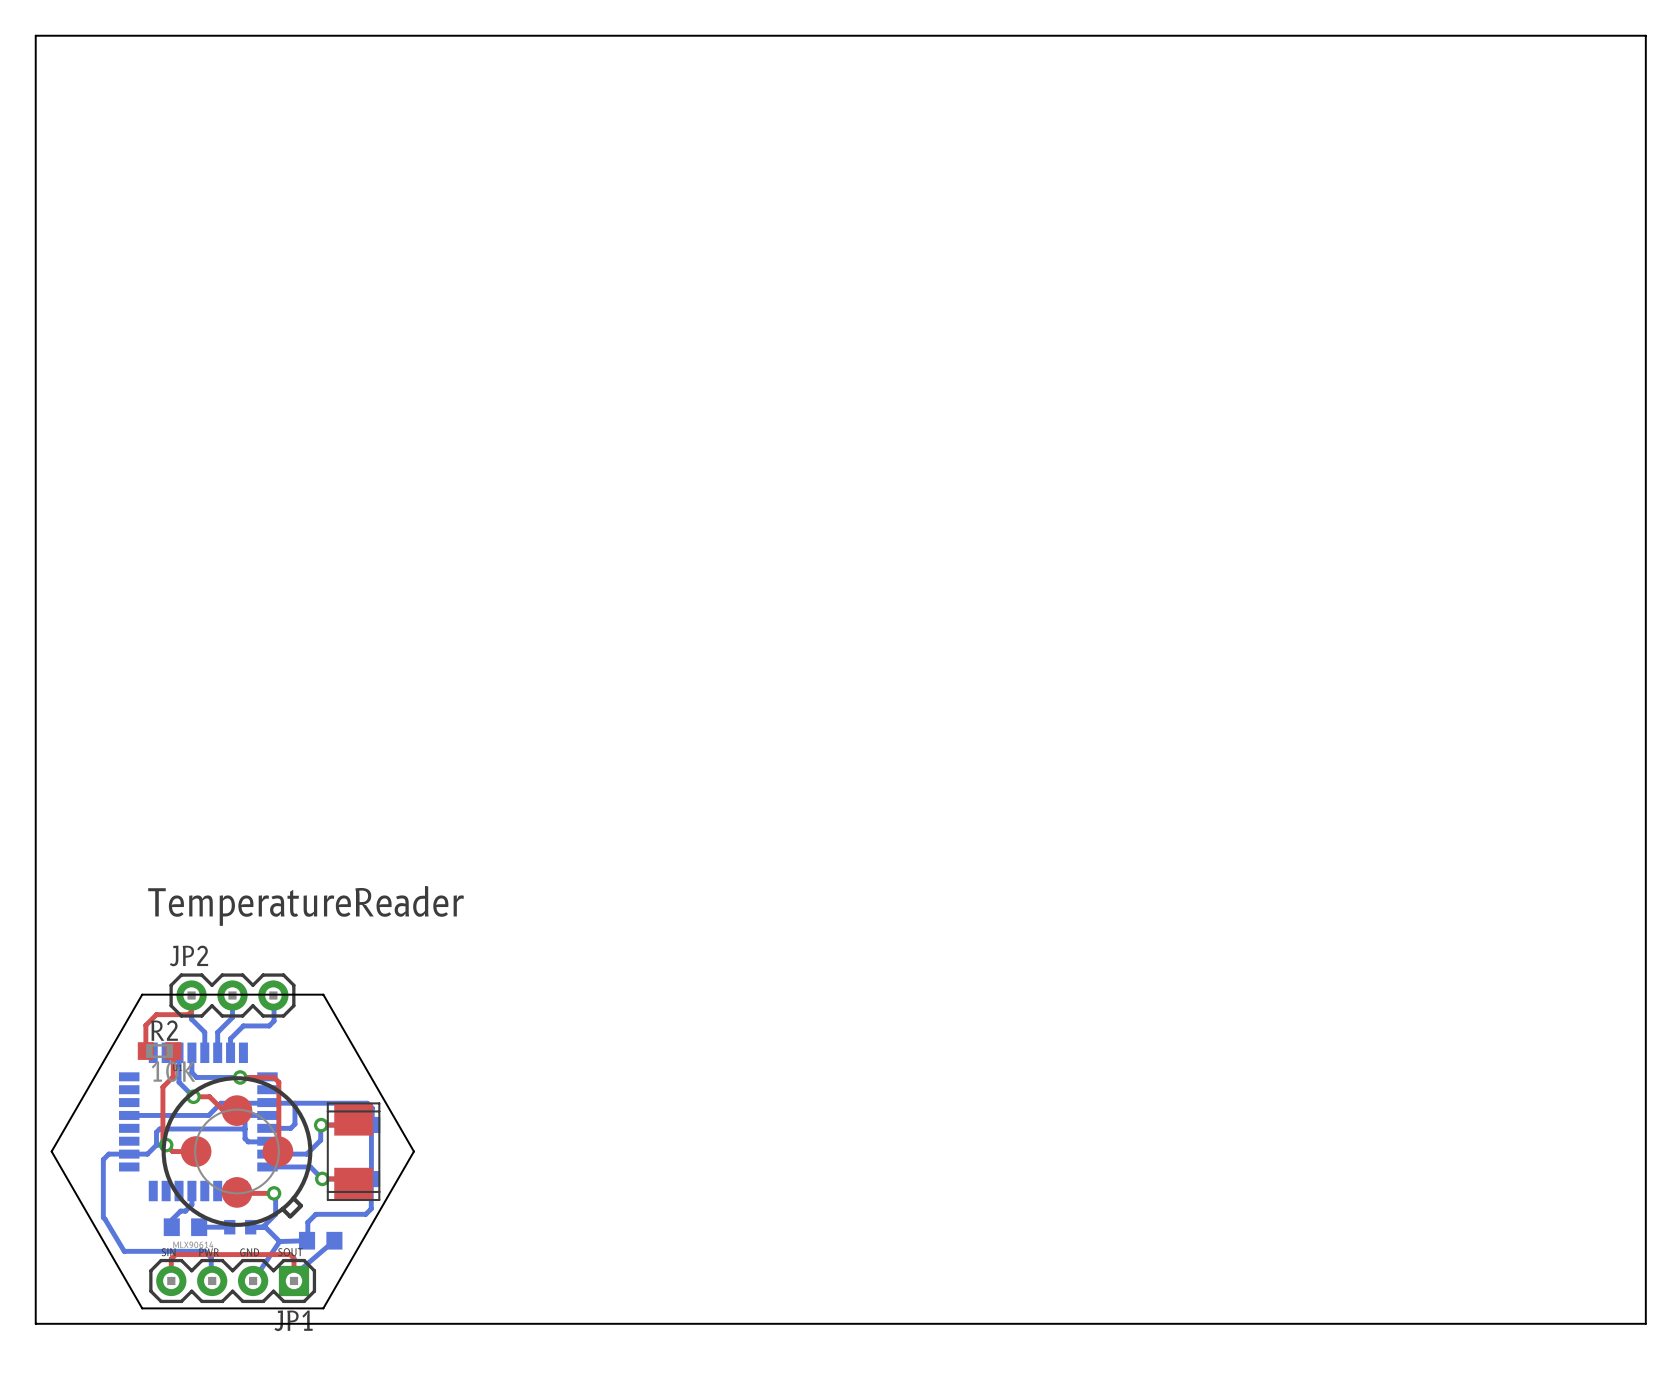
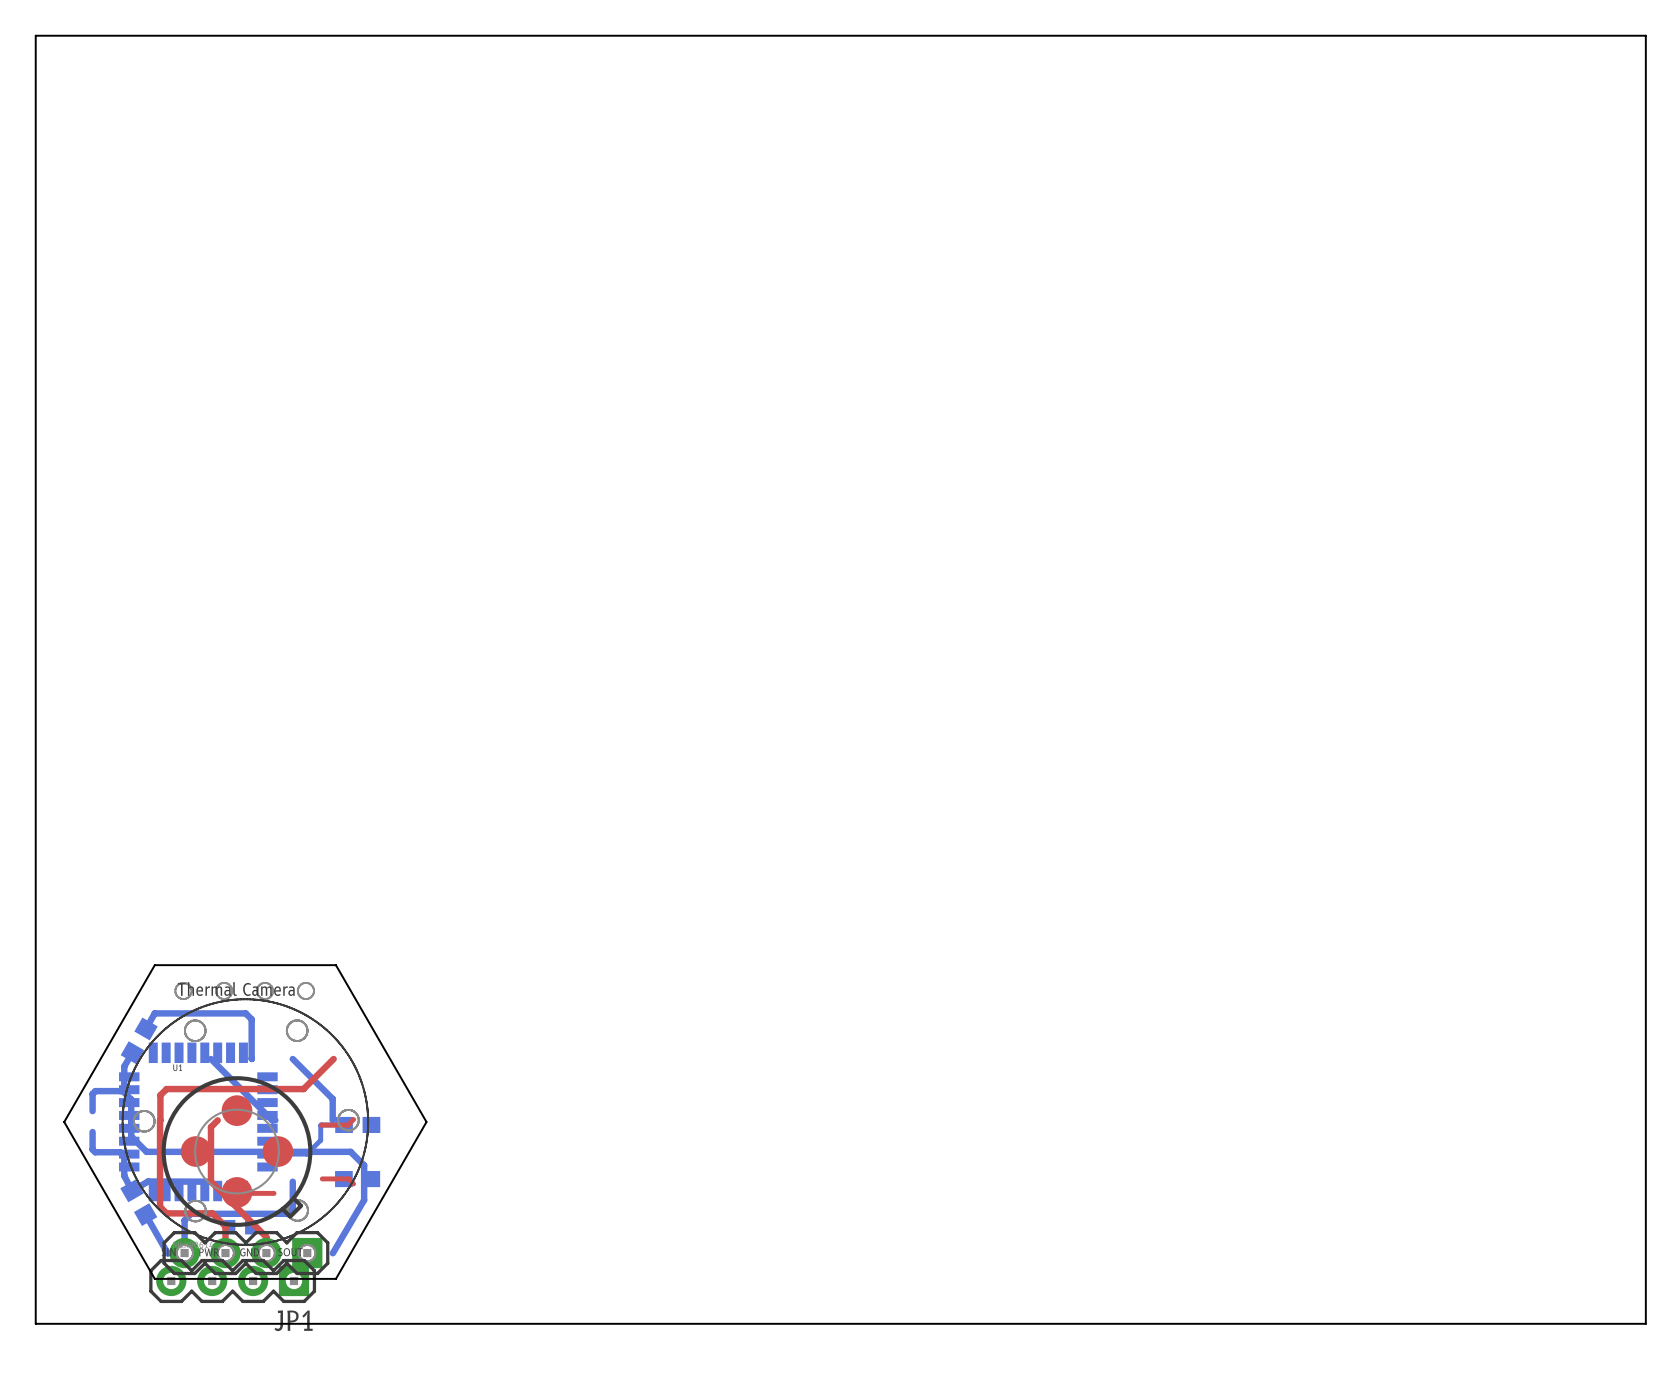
text: TemperatureReader (305, 905) -> none
line: none -> (182, 982) (177, 986) (175, 992) (178, 997) (184, 999) (189, 995) (191, 989) (188, 984) (182, 982)
line: none -> (223, 982) (229, 984) (232, 989) (230, 995) (225, 999) (219, 997) (216, 992) (217, 986) (223, 982)
line: none -> (263, 982) (269, 984) (273, 989) (271, 995) (266, 999) (260, 997) (256, 992) (258, 986) (263, 982)
line: none -> (304, 982) (310, 984) (313, 989) (312, 995) (307, 999) (300, 997) (297, 992) (299, 986) (304, 982)
text: none -> Thermal Camera (236, 989)
board edge: (142, 994) (51, 1151) (142, 1308) (323, 1308) (413, 1151) (323, 994) (142, 994) -> (154, 965) (64, 1122) (154, 1278) (335, 1278) (426, 1122) (335, 965) (154, 965)
bottom track: (191, 995) (191, 1019) (204, 1032) (204, 1052) -> none
top track: (191, 995) (191, 1011) (188, 1014) (156, 1014) (145, 1025) (145, 1051) -> none
bottom track: (232, 995) (232, 1017) (217, 1032) (217, 1052) -> none
JP2: (232, 995) -> none
bottom track: (273, 995) (274, 1021) (269, 1025) (243, 1025) (230, 1038) (230, 1052) -> none
line: none -> (193, 1020) (187, 1024) (185, 1032) (188, 1038) (196, 1040) (203, 1037) (205, 1029) (201, 1022) (193, 1020)
line: none -> (295, 1020) (289, 1024) (286, 1032) (290, 1038) (298, 1040) (305, 1037) (307, 1029) (303, 1022) (295, 1020)
bottom track: none -> (146, 1028) (154, 1013) (245, 1013) (251, 1019) (251, 1058)
R2 side: top (159, 1051) -> bottom (139, 1040)
top track: (173, 1051) (173, 1076) (162, 1087) (162, 1141) (172, 1151) (196, 1151) -> none
bottom track: none -> (132, 1052) (124, 1066) (124, 1087) (120, 1091) (95, 1091) (92, 1093) (92, 1111)
bottom track: (179, 1052) (179, 1082) (193, 1096) -> none
bottom track: (191, 1052) (191, 1072) (196, 1077) (240, 1077) -> none
bottom track: none -> (210, 1059) (272, 1120) (275, 1120)
bottom track: none -> (292, 1059) (332, 1098) (332, 1120)
top track: none -> (333, 1059) (303, 1089) (166, 1089) (160, 1095) (160, 1206) (166, 1213) (212, 1213) (225, 1226) (225, 1253)
top track: (240, 1077) (274, 1077) (278, 1082) (277, 1151) -> none
via: (240, 1077) -> none
bottom track: none -> (121, 1089) (131, 1099) (131, 1136) (146, 1151) (350, 1151) (364, 1165) (364, 1200) (332, 1253)
top track: (193, 1096) (209, 1096) (222, 1109) (236, 1110) -> none
via: (193, 1096) -> none
bottom track: (294, 1103) (294, 1124) (290, 1128) (267, 1128) -> none
line: none -> (348, 1109) (340, 1113) (338, 1120) (341, 1127) (348, 1130) (355, 1127) (358, 1119) (355, 1112) (348, 1109)
line: none -> (143, 1110) (136, 1114) (134, 1121) (137, 1129) (144, 1131) (152, 1128) (154, 1120) (151, 1113) (143, 1110)
bottom track: (129, 1115) (208, 1115) (220, 1103) (367, 1103) (372, 1108) (371, 1178) -> none
bottom track: (267, 1115) (247, 1115) (245, 1117) (245, 1138) (248, 1141) (267, 1141) -> none
line: none -> (122, 1120) (125, 1096) (132, 1073) (144, 1052) (159, 1034) (178, 1019) (199, 1008) (222, 1001) (246, 999) (271, 1001) (293, 1008) (314, 1020) (332, 1035) (348, 1055) (359, 1076) (366, 1099) (368, 1123) (365, 1147) (358, 1170) (346, 1191) (331, 1209) (312, 1224) (291, 1235) (268, 1242) (244, 1244) (219, 1242) (196, 1234) (175, 1223) (157, 1208) (143, 1189) (131, 1168) (124, 1145) (122, 1122)
top track: none -> (217, 1120) (210, 1127) (210, 1181) (266, 1237) (266, 1253)
via: (321, 1125) -> none
bottom track: (245, 1128) (159, 1128) (156, 1132) (156, 1145) -> none
bottom track: none -> (92, 1132) (92, 1149) (95, 1152) (120, 1152) (124, 1156) (124, 1175) (131, 1190) (148, 1181) (210, 1181)
bottom track: (156, 1145) (147, 1154) (108, 1154) (103, 1159) (103, 1217) (124, 1251) (204, 1251) (211, 1257) (212, 1280) -> none
via: (166, 1145) -> none
part: (353, 1151) -> none
bottom track: (267, 1166) (310, 1166) (322, 1179) (343, 1179) -> none
via: (322, 1178) -> none
bottom track: (371, 1179) (371, 1208) (365, 1214) (315, 1214) (307, 1222) (307, 1240) (279, 1241) -> none
bottom track: none -> (292, 1181) (292, 1208) (287, 1214)
bottom track: (191, 1191) (191, 1204) (185, 1211) (180, 1211) (172, 1219) (171, 1227) -> none
bottom track: (274, 1193) (275, 1214) (262, 1227) -> none
via: (274, 1193) -> none
line: none -> (194, 1200) (187, 1204) (185, 1212) (189, 1219) (196, 1221) (203, 1217) (205, 1209) (201, 1202) (194, 1200)
line: none -> (296, 1200) (289, 1203) (287, 1211) (290, 1218) (298, 1220) (305, 1217) (307, 1209) (304, 1202) (296, 1200)
part: none -> (138, 1202)
bottom track: none -> (287, 1213) (191, 1213) (184, 1220) (184, 1253) (167, 1253) (145, 1214)
part: (185, 1227) -> none
bottom track: (199, 1227) (229, 1227) -> none
bottom track: (250, 1227) (265, 1227) (279, 1241) -> none
part: (320, 1240) -> none
bottom track: (334, 1240) (290, 1277) (293, 1280) -> none
bottom track: (279, 1241) (253, 1280) -> none
line: none -> (183, 1245) (189, 1246) (192, 1251) (191, 1258) (185, 1261) (179, 1259) (176, 1254) (178, 1248) (183, 1245)
line: none -> (224, 1245) (230, 1246) (233, 1251) (232, 1258) (226, 1261) (220, 1259) (217, 1254) (219, 1248) (224, 1245)
line: none -> (265, 1245) (271, 1246) (274, 1251) (273, 1258) (267, 1261) (261, 1259) (258, 1254) (260, 1248) (265, 1245)
line: none -> (306, 1245) (300, 1248) (299, 1254) (302, 1259) (308, 1261) (313, 1258) (315, 1251) (312, 1246) (306, 1245)
part: none -> (245, 1253)
top track: (171, 1280) (171, 1259) (175, 1254) (290, 1254) (293, 1258) (293, 1280) -> none

